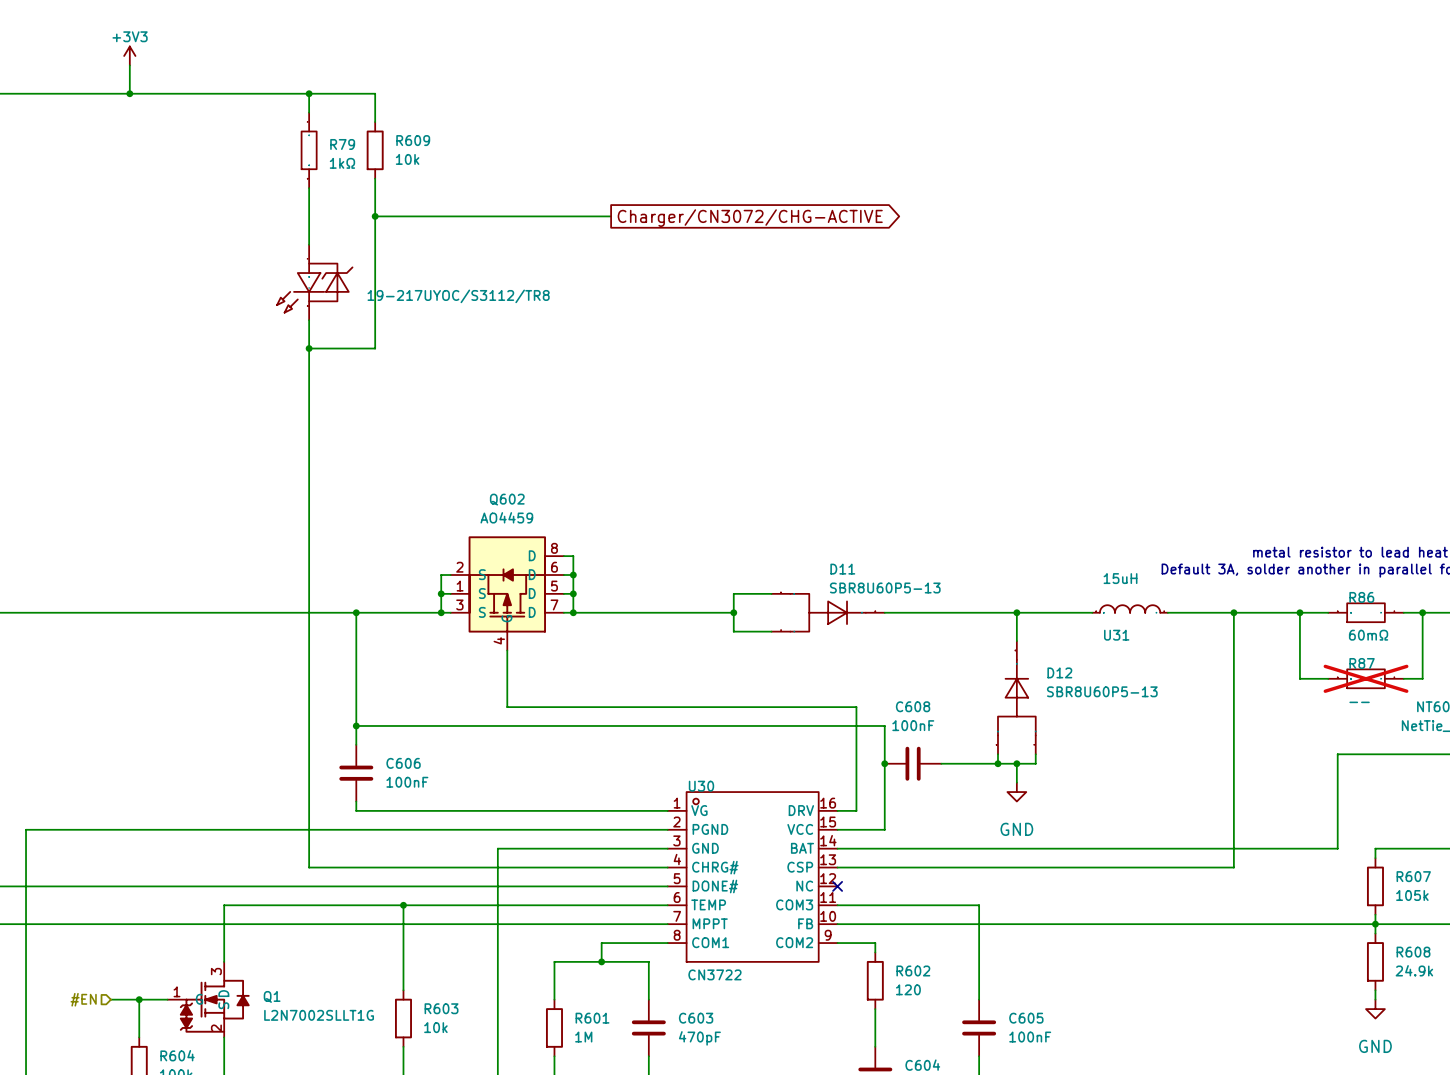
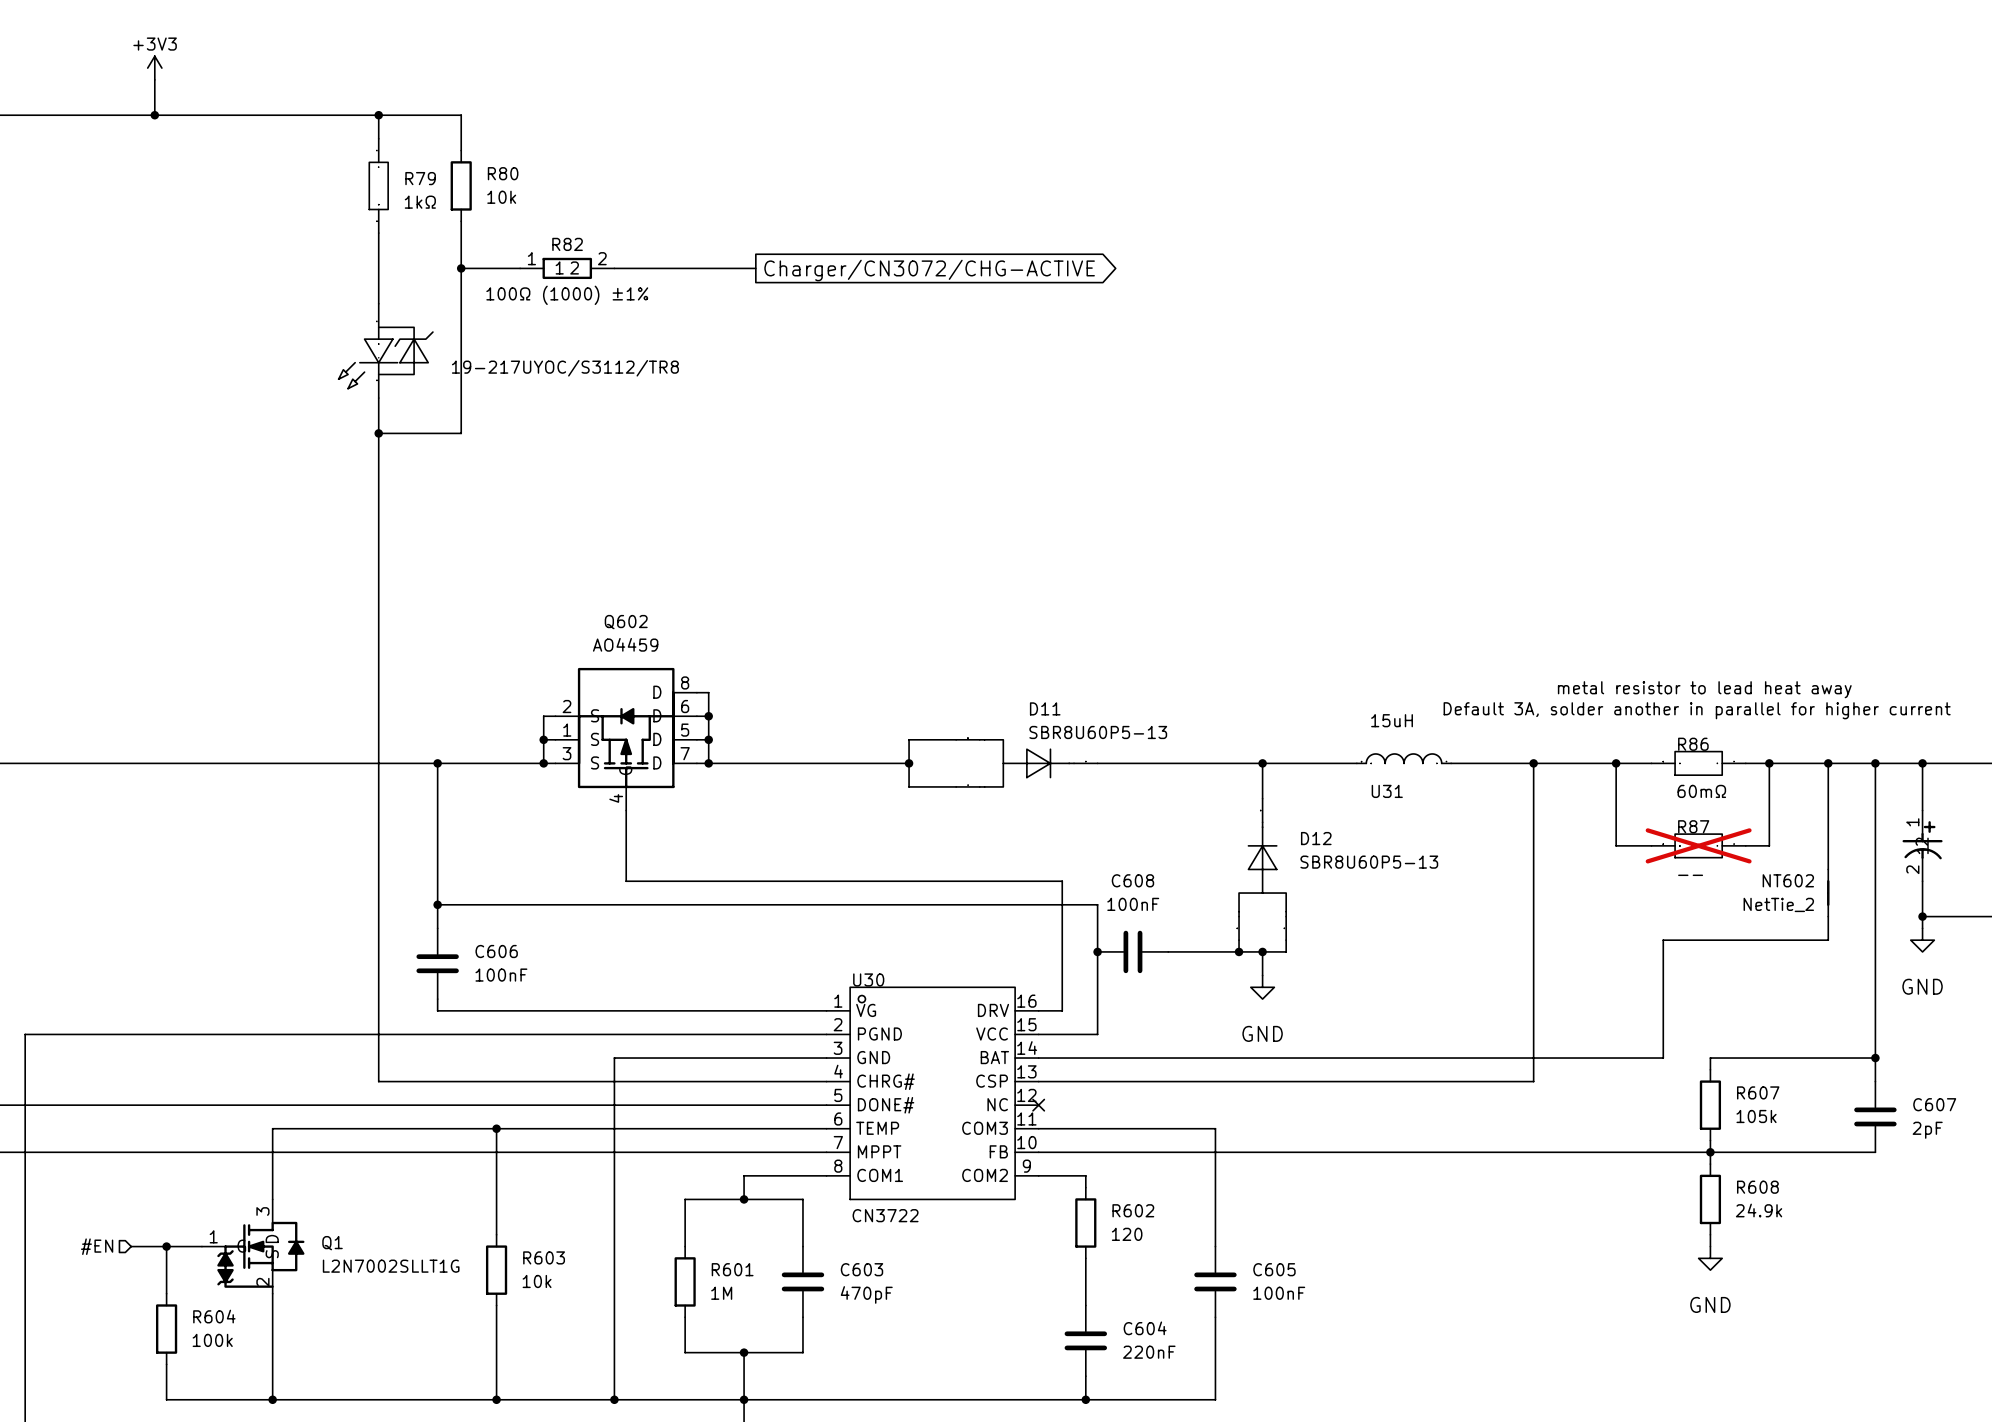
R609 name: R609 (413, 140) -> R80 (503, 173)
R82: none -> (567, 268)

